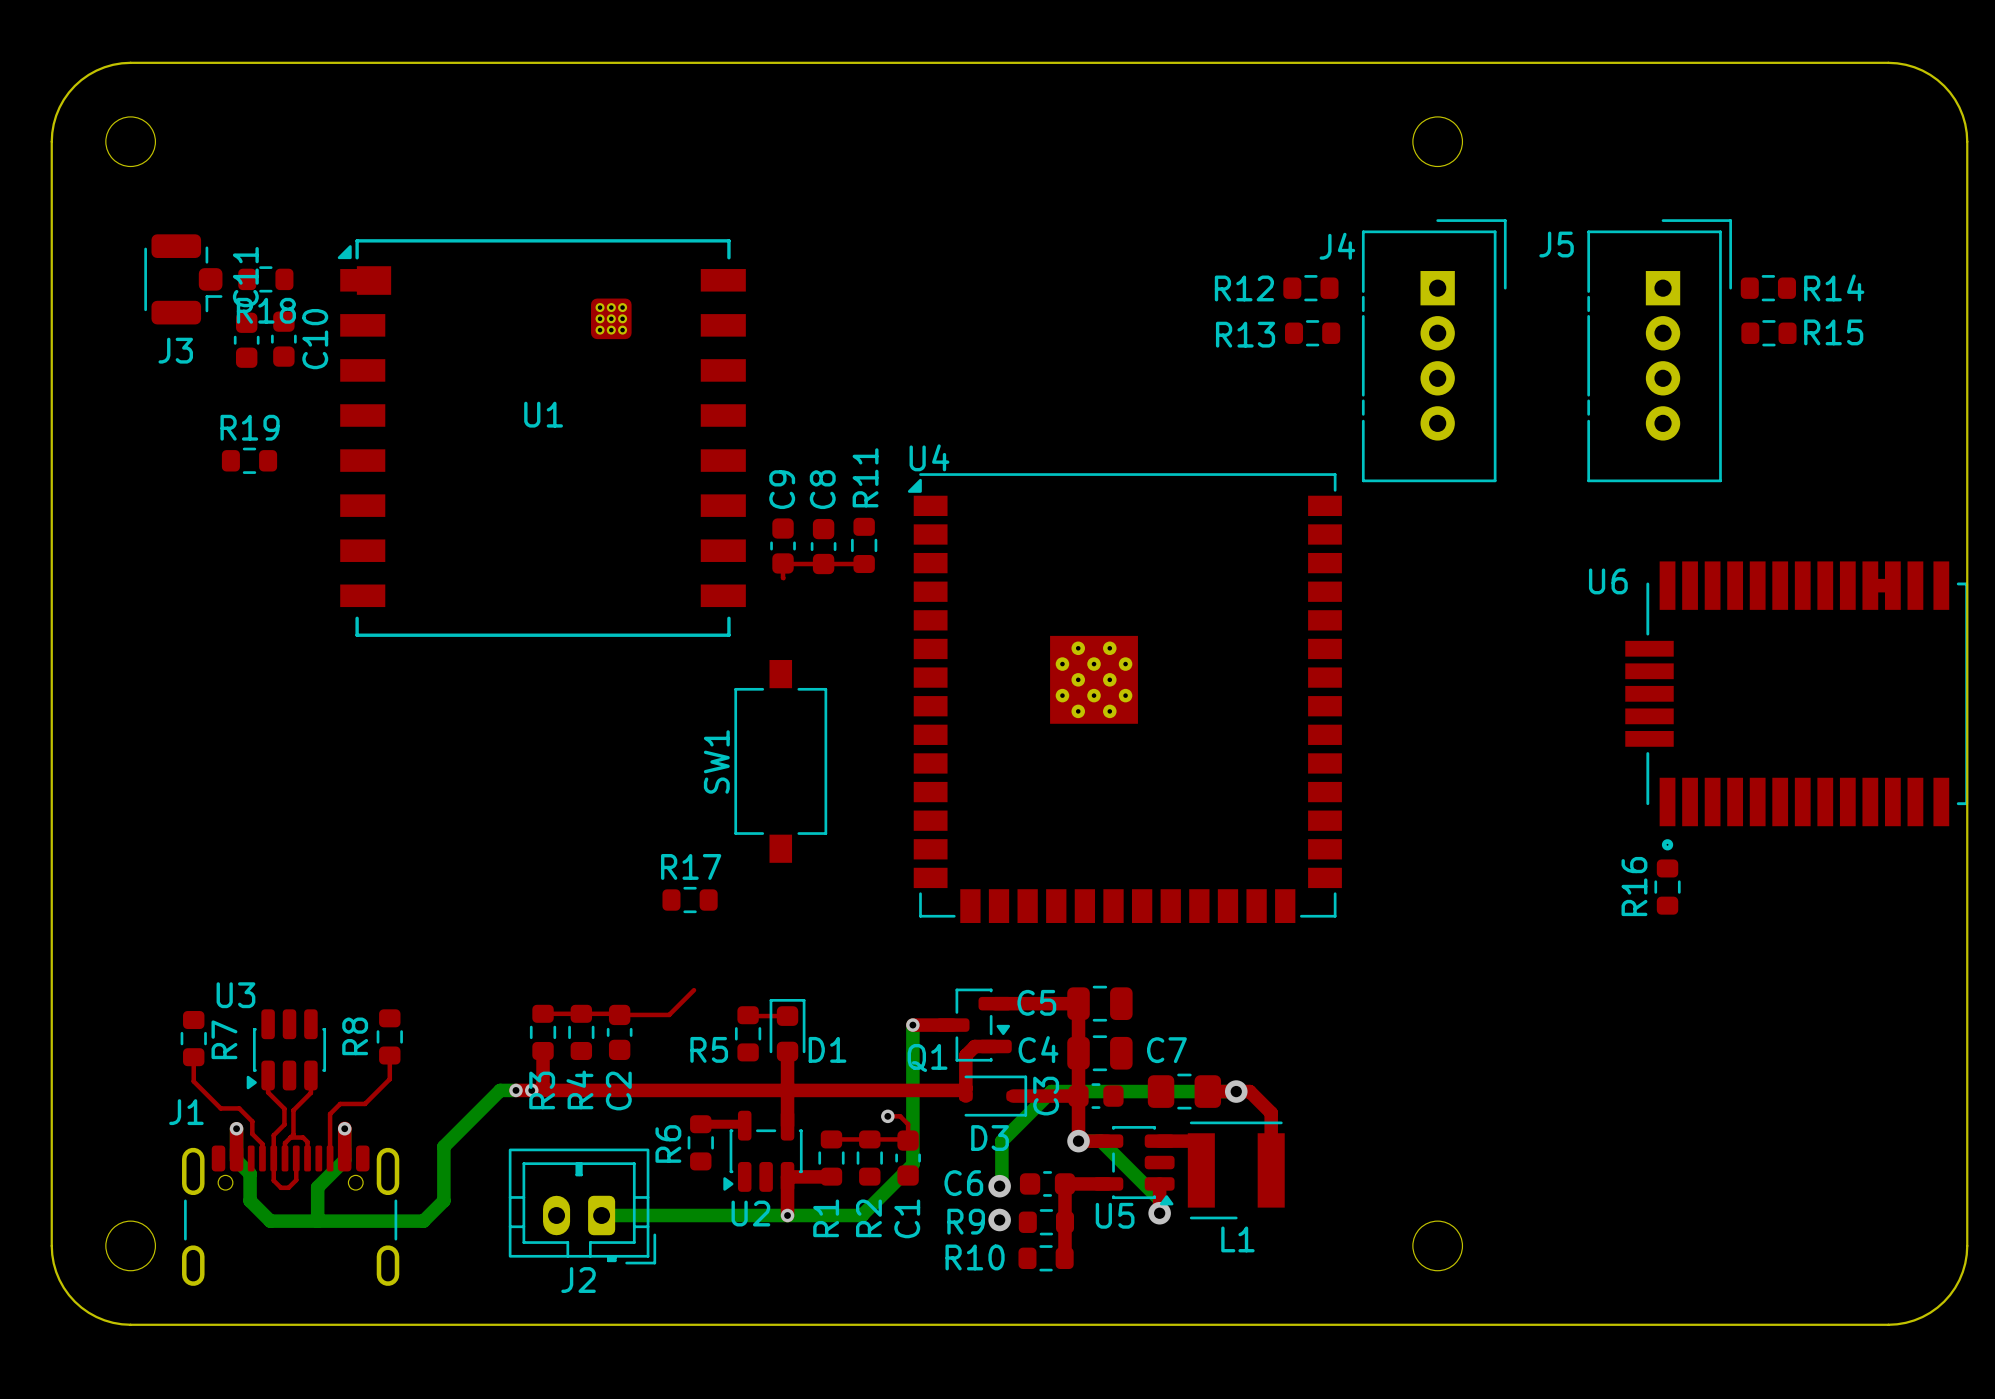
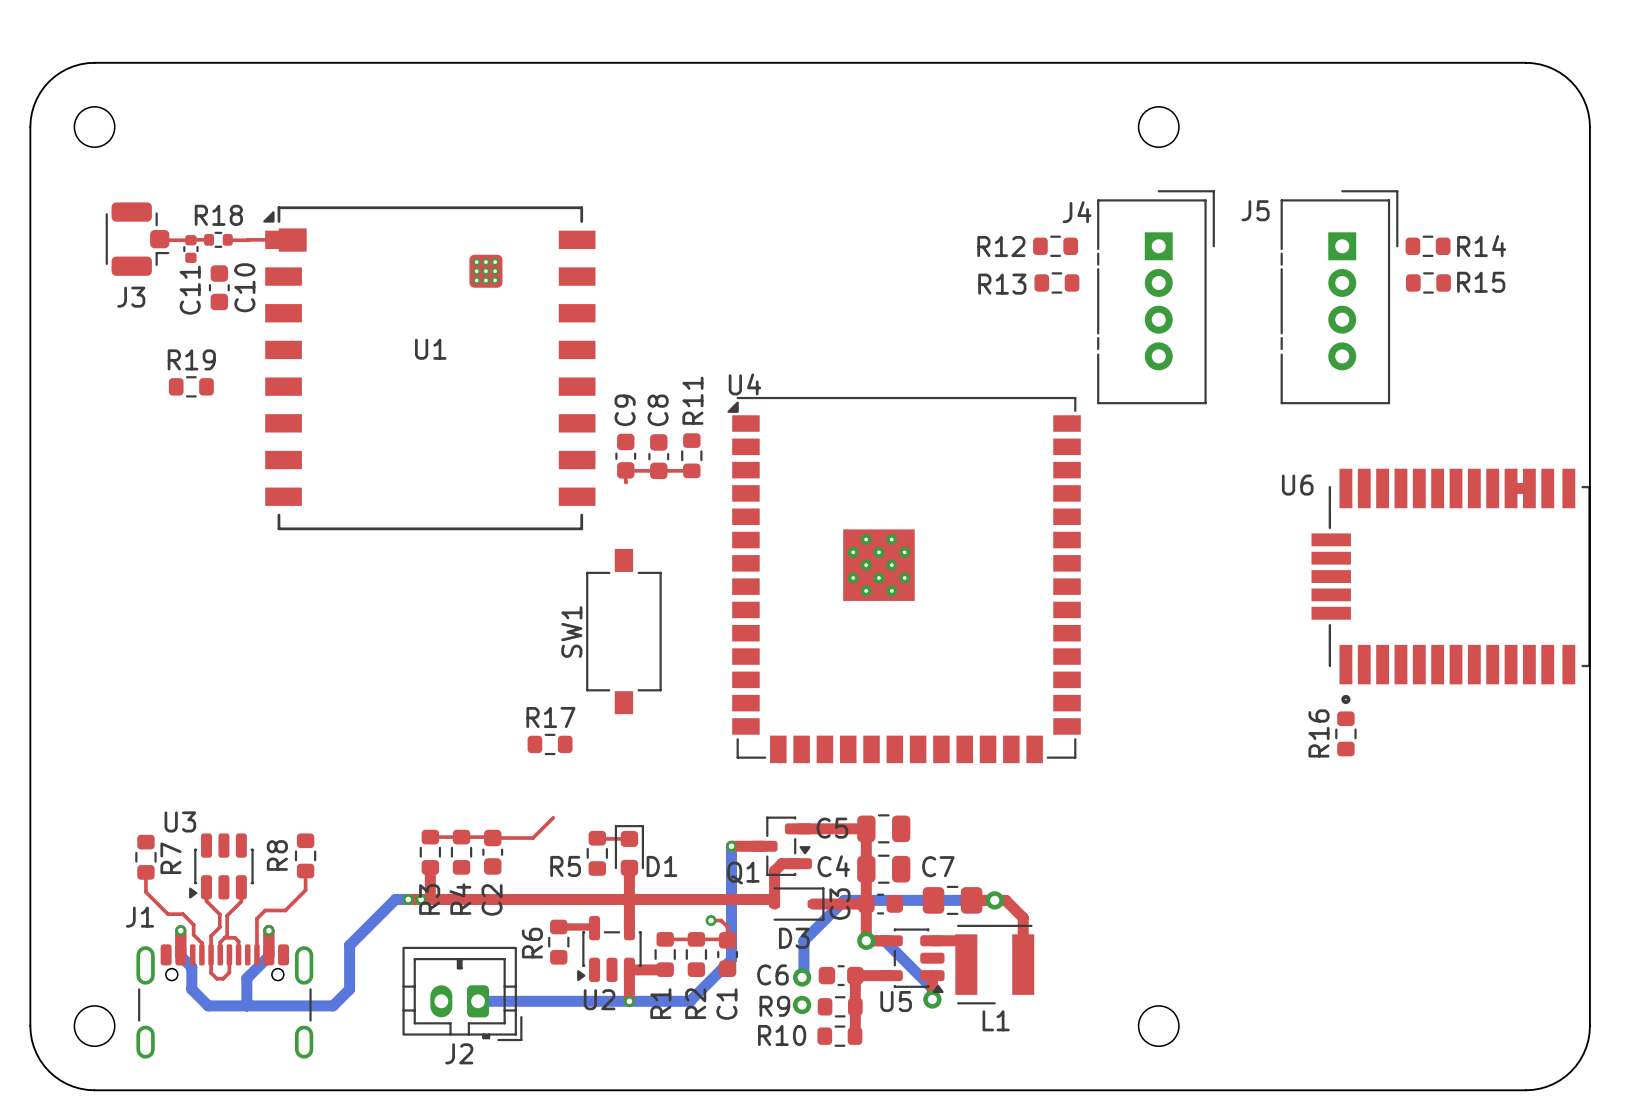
R18 footprint: [238, 266, 294, 293] -> [204, 231, 233, 248]
C11 name position: C11 (245, 277) -> C11 (190, 290)
top track: none -> (161, 239) (209, 239)
top track: none -> (227, 239) (283, 239)
R18 name position: R18 (266, 310) -> R18 (218, 215)
C11 footprint: [233, 312, 260, 368] -> [183, 235, 199, 263]

